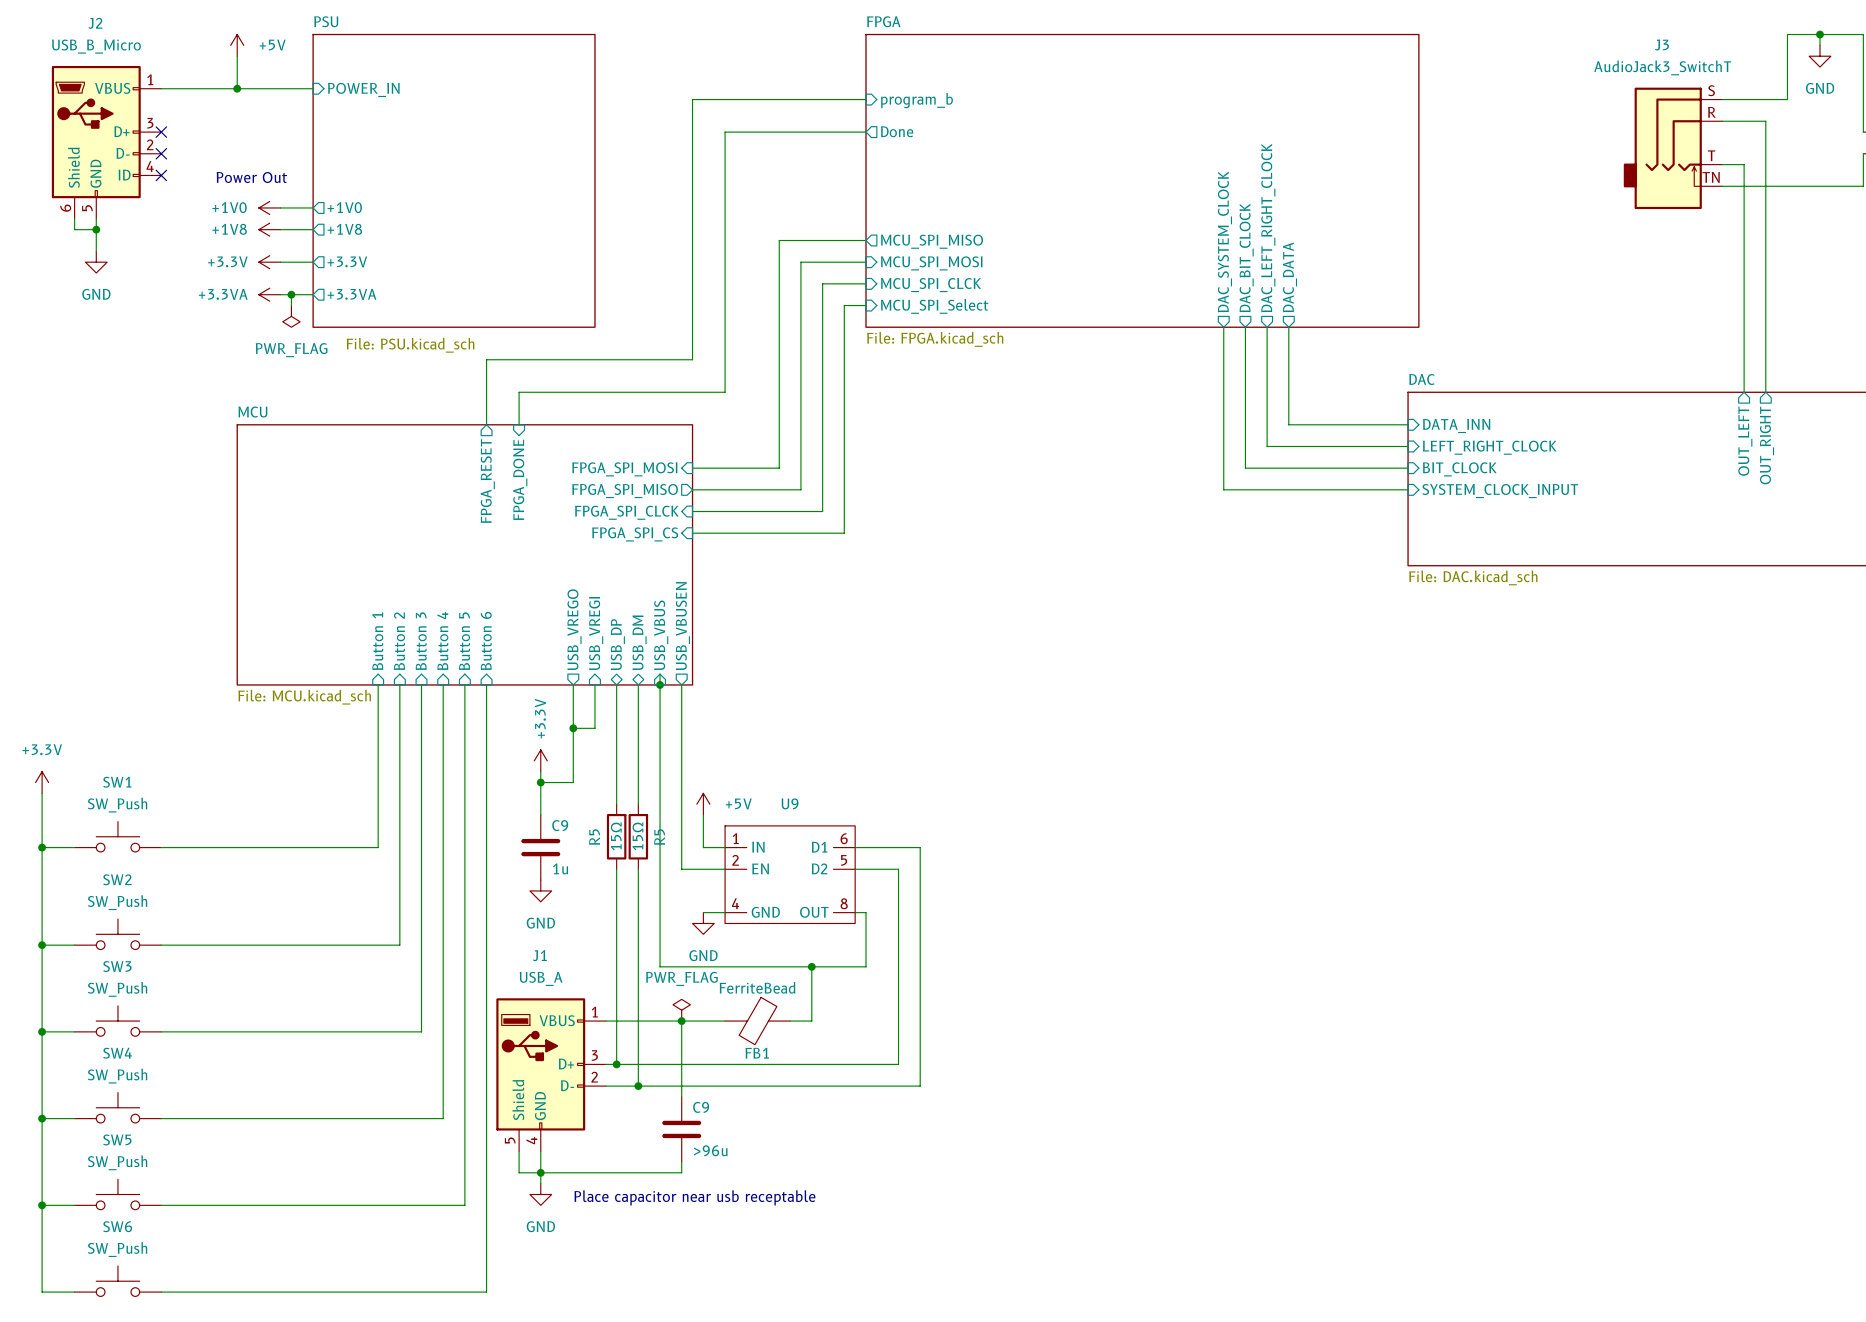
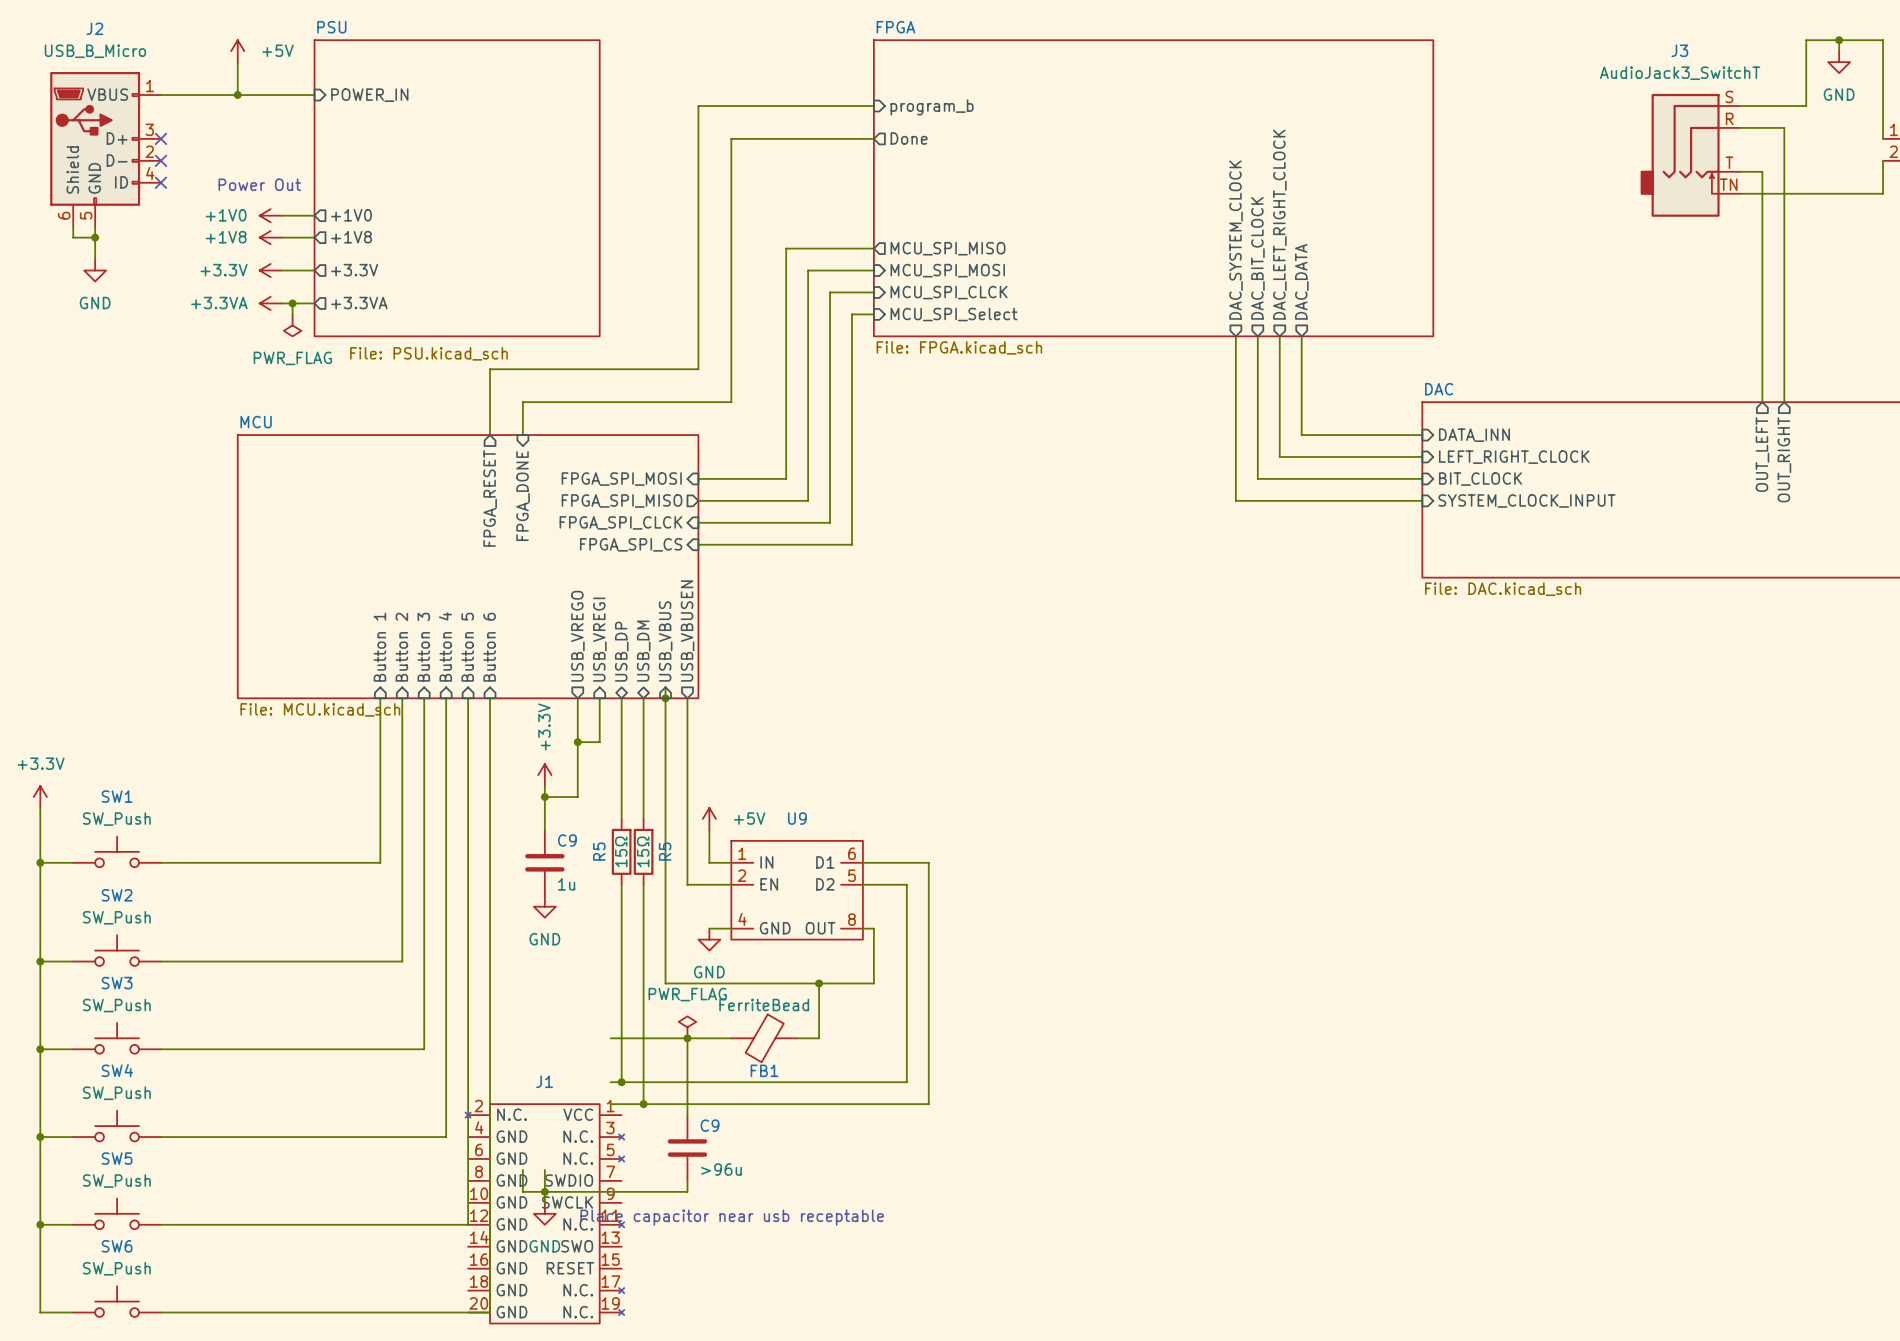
J1 value: USB_A (541, 978) -> none
J1 symbol: [496, 998, 606, 1152] -> [465, 1104, 625, 1324]

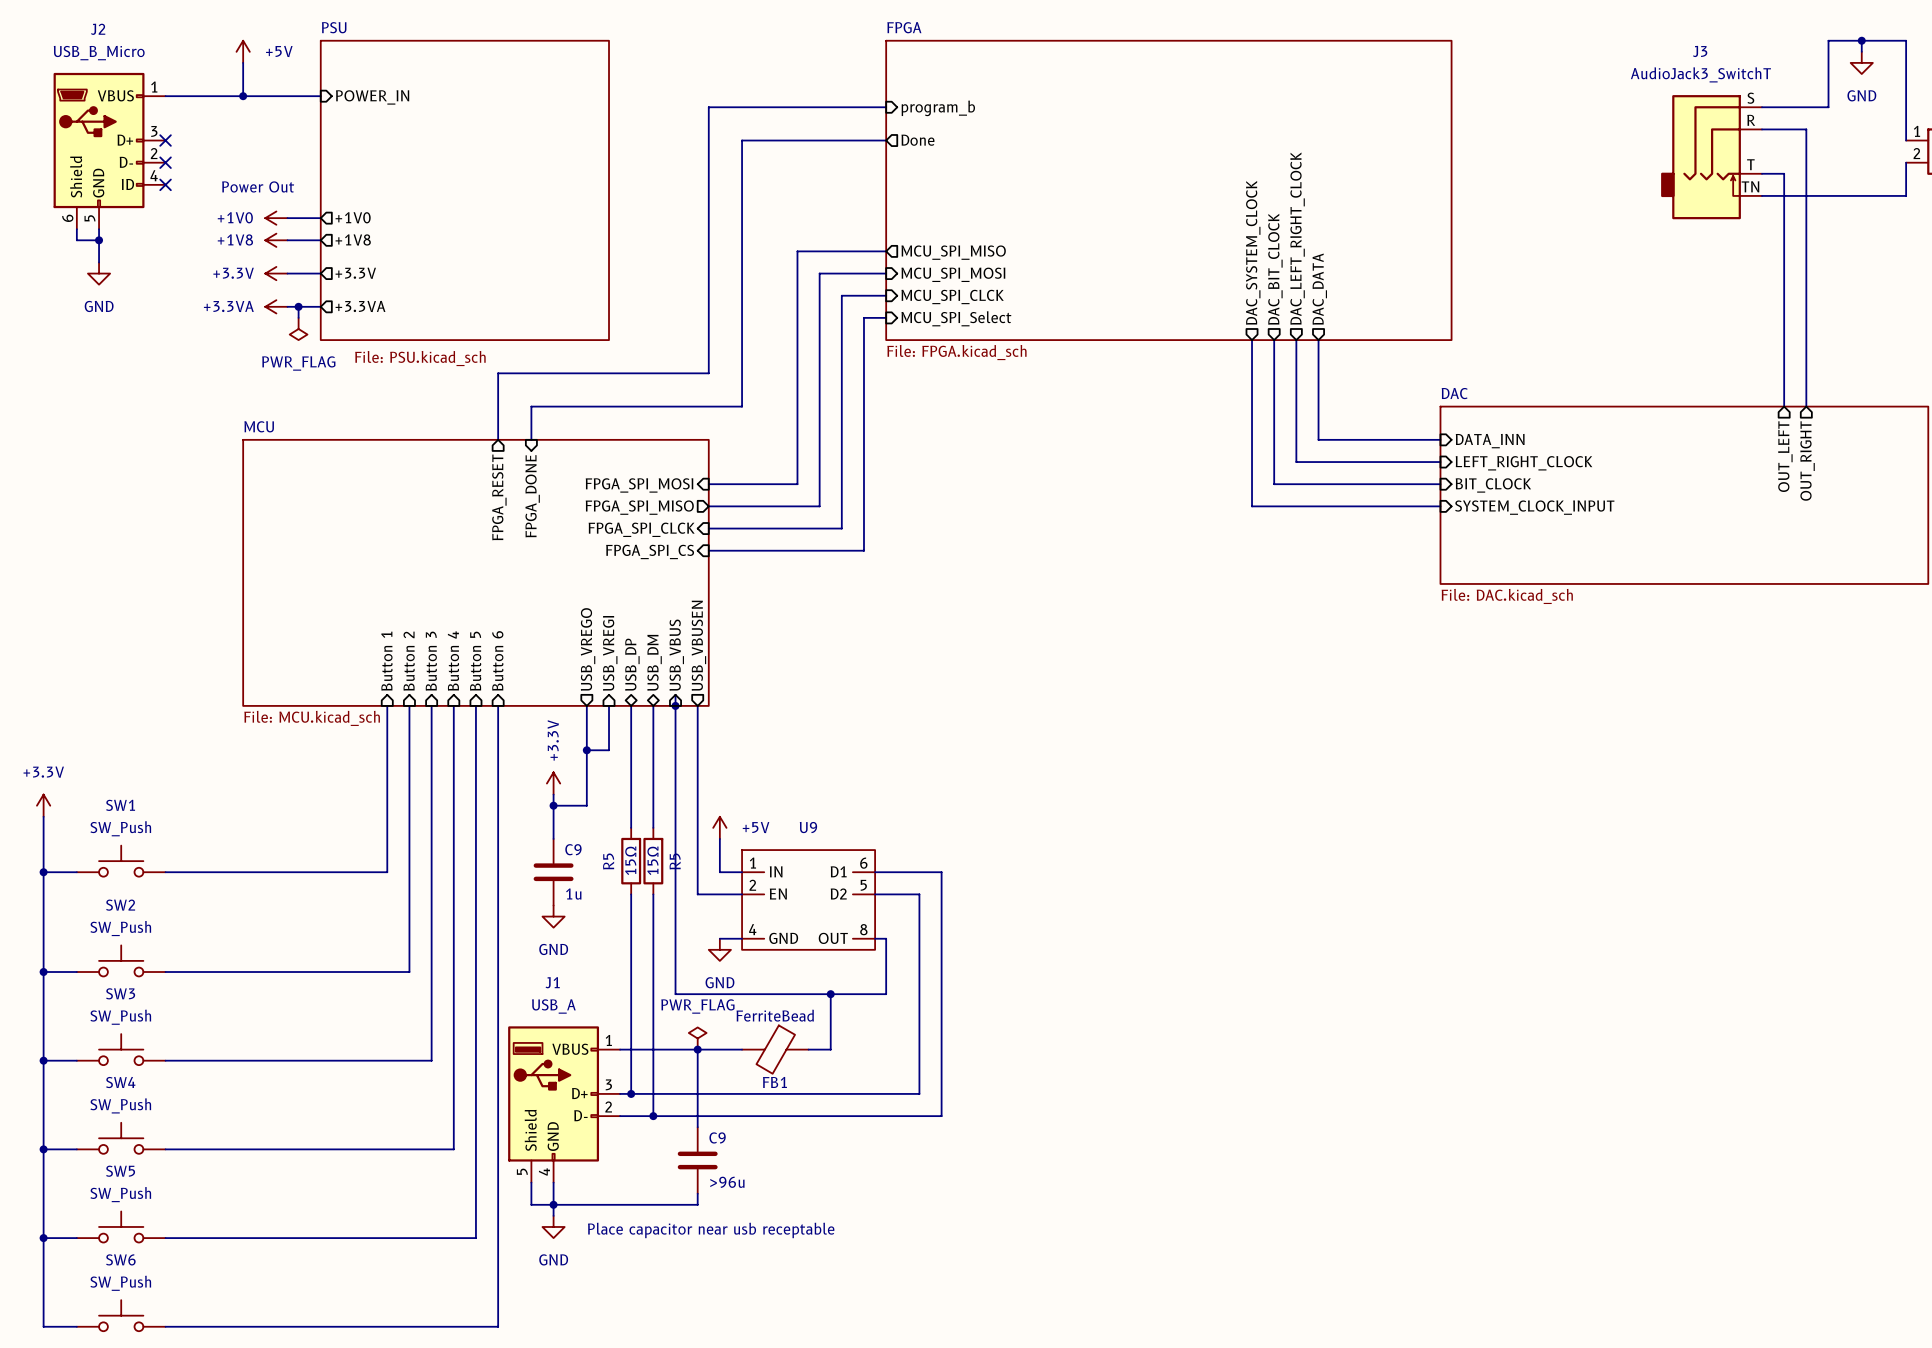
J1 value: none -> USB_A (553, 1006)
J1 symbol: [465, 1104, 625, 1324] -> [508, 1026, 621, 1183]

